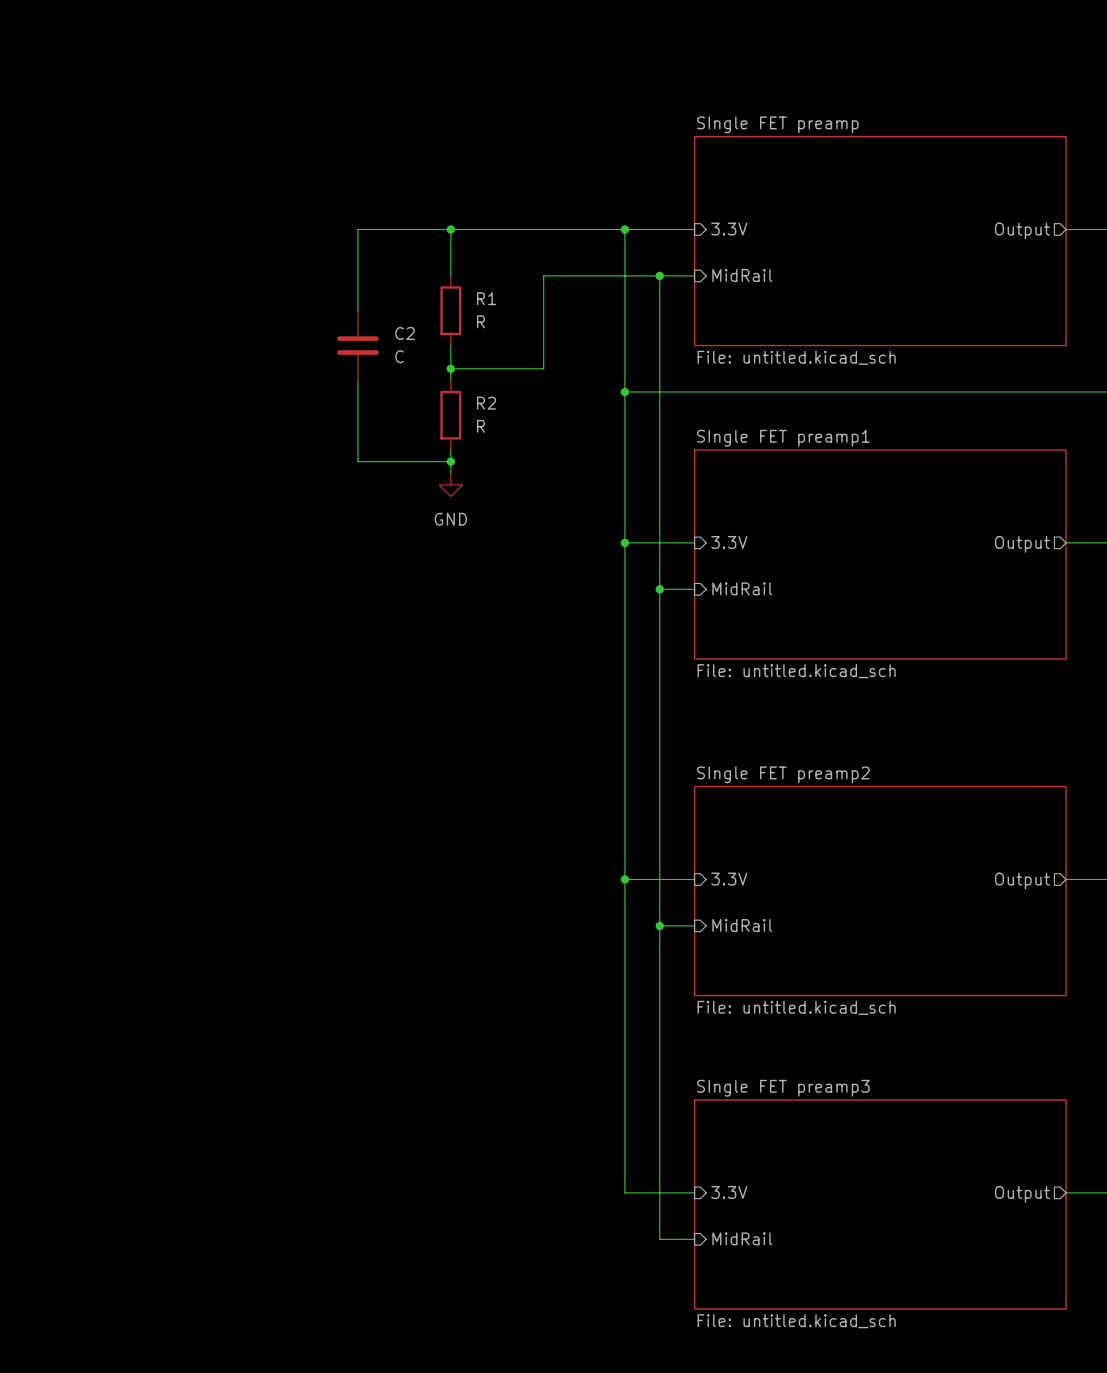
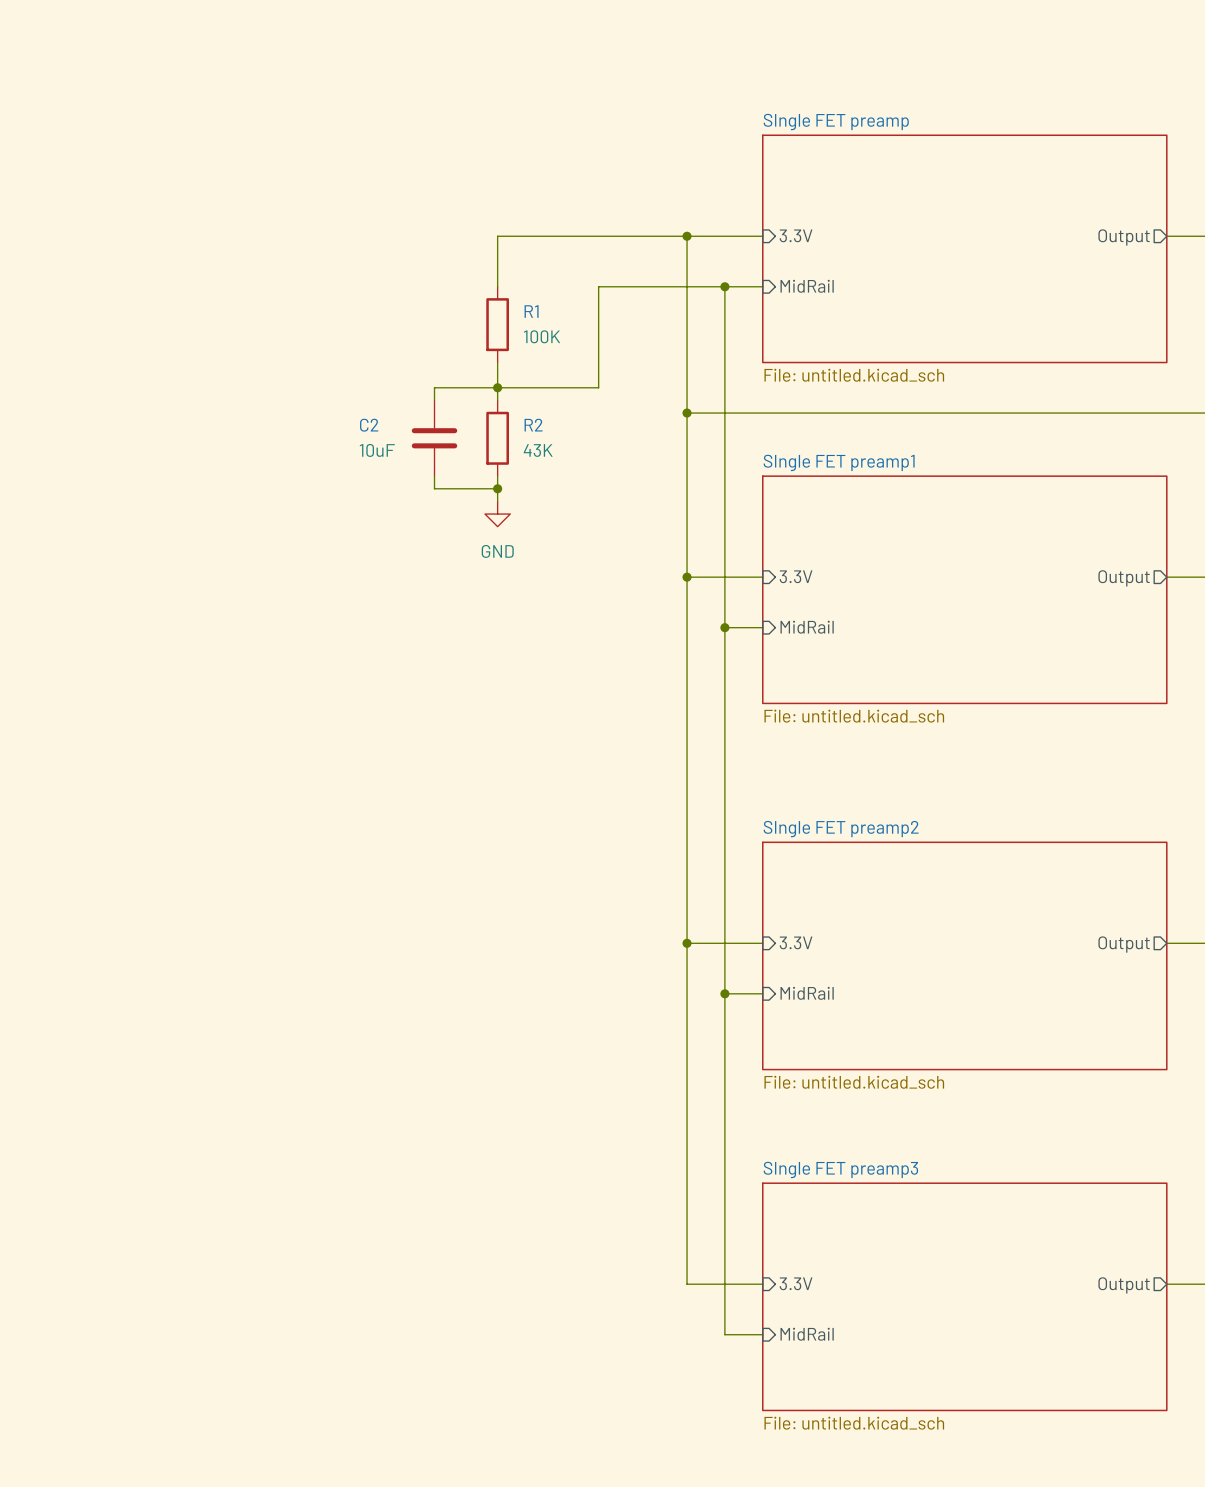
wire: (450, 229) (357, 229) (357, 310) -> none
junction: (450, 229) -> none
R1 value: R (481, 321) -> 100K (542, 336)
C2 name position: C2 (405, 333) -> C2 (369, 425)
C2 position: (357, 345) -> (434, 438)
C2 value: C (399, 356) -> 10uF (377, 450)
wire: none -> (497, 387) (434, 387) (434, 400)
wire: (357, 380) (357, 461) (392, 461) -> (434, 476) (434, 488)
R2 value: R (481, 426) -> 43K (538, 450)

